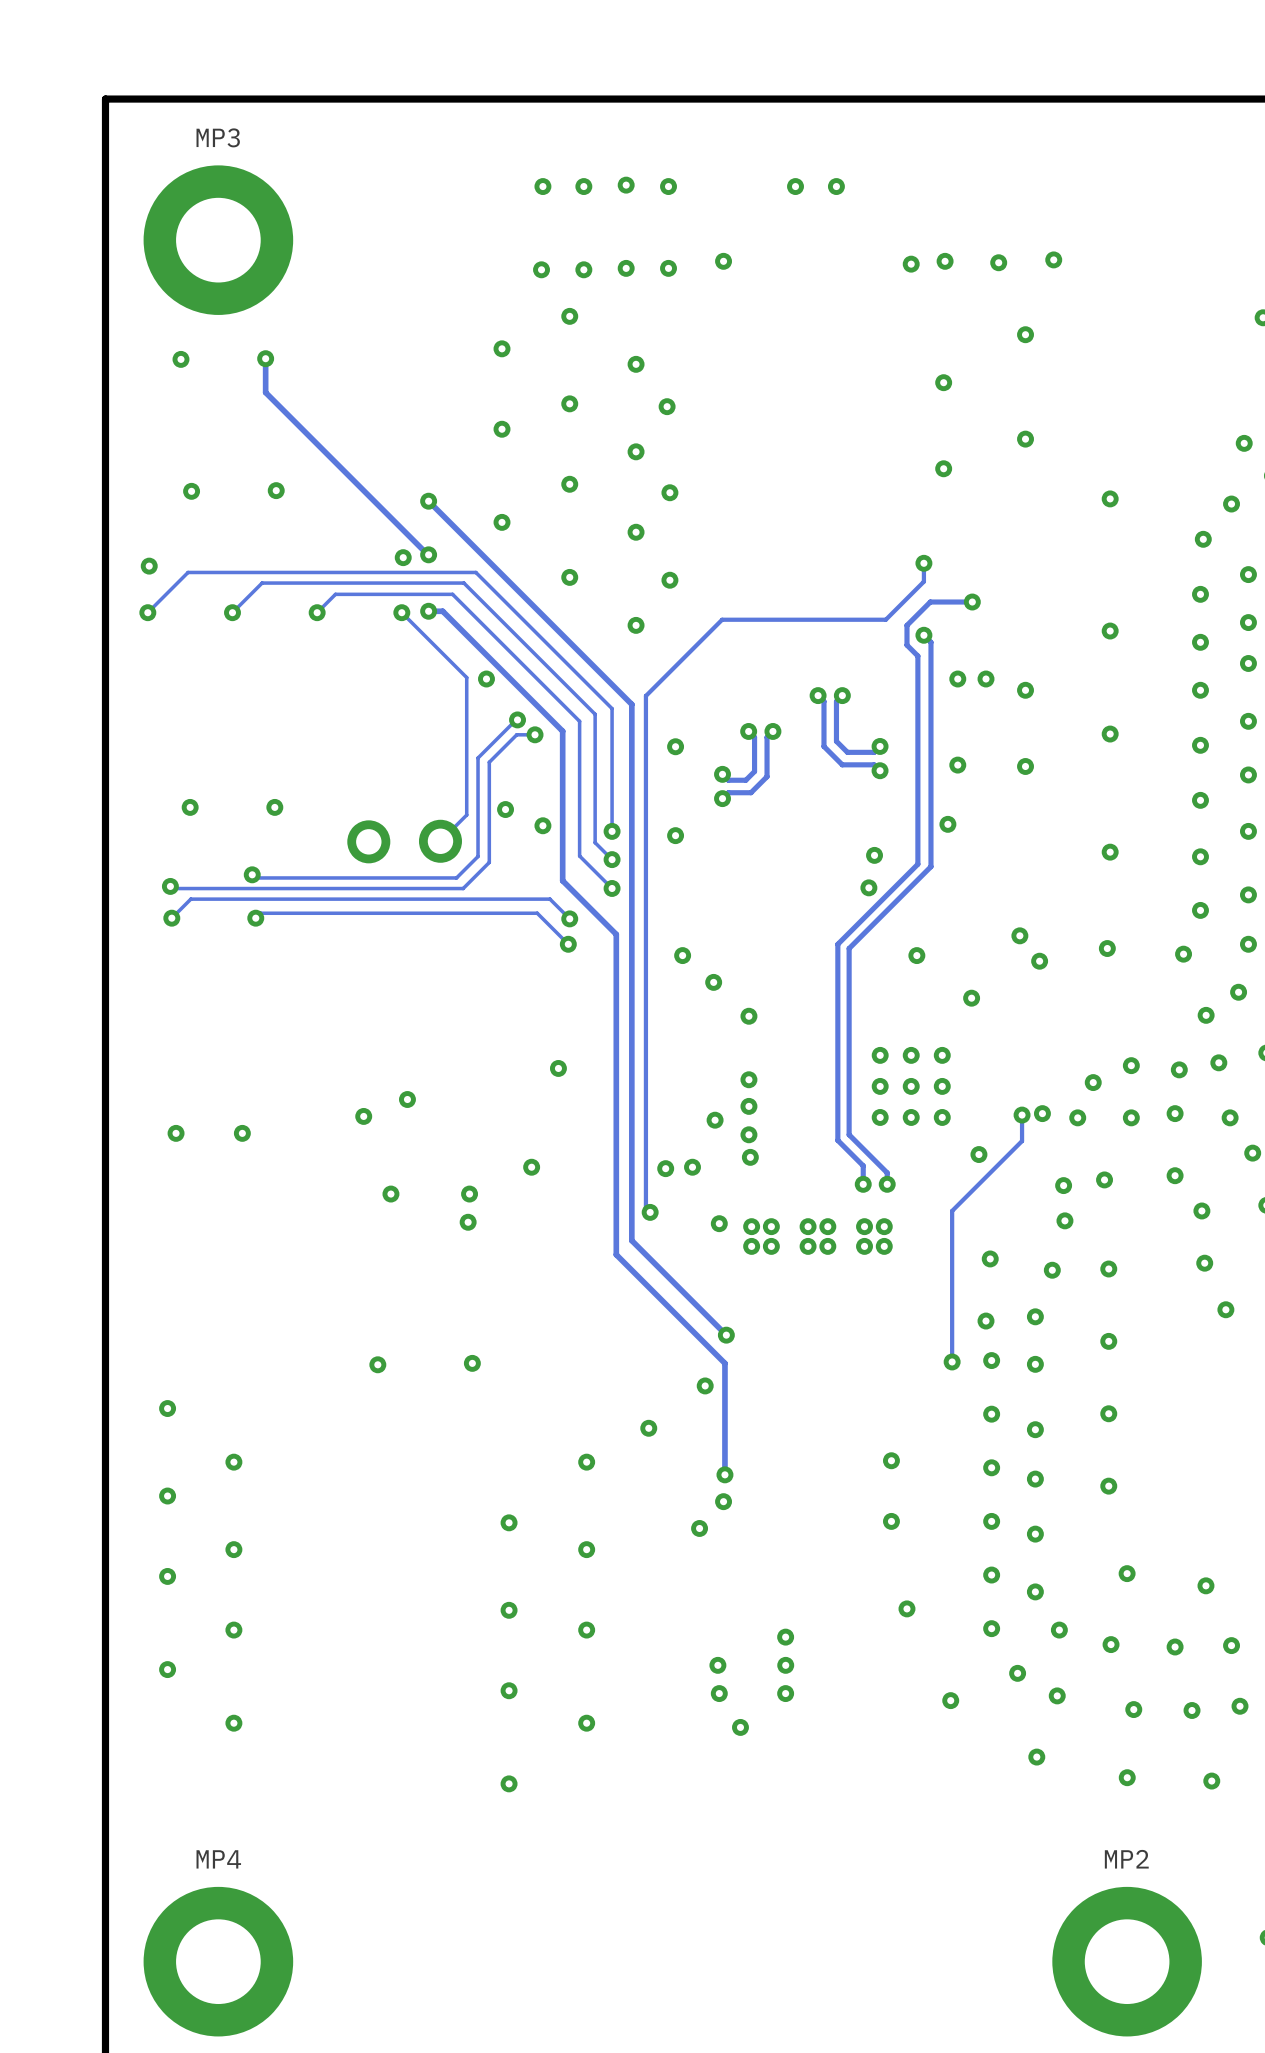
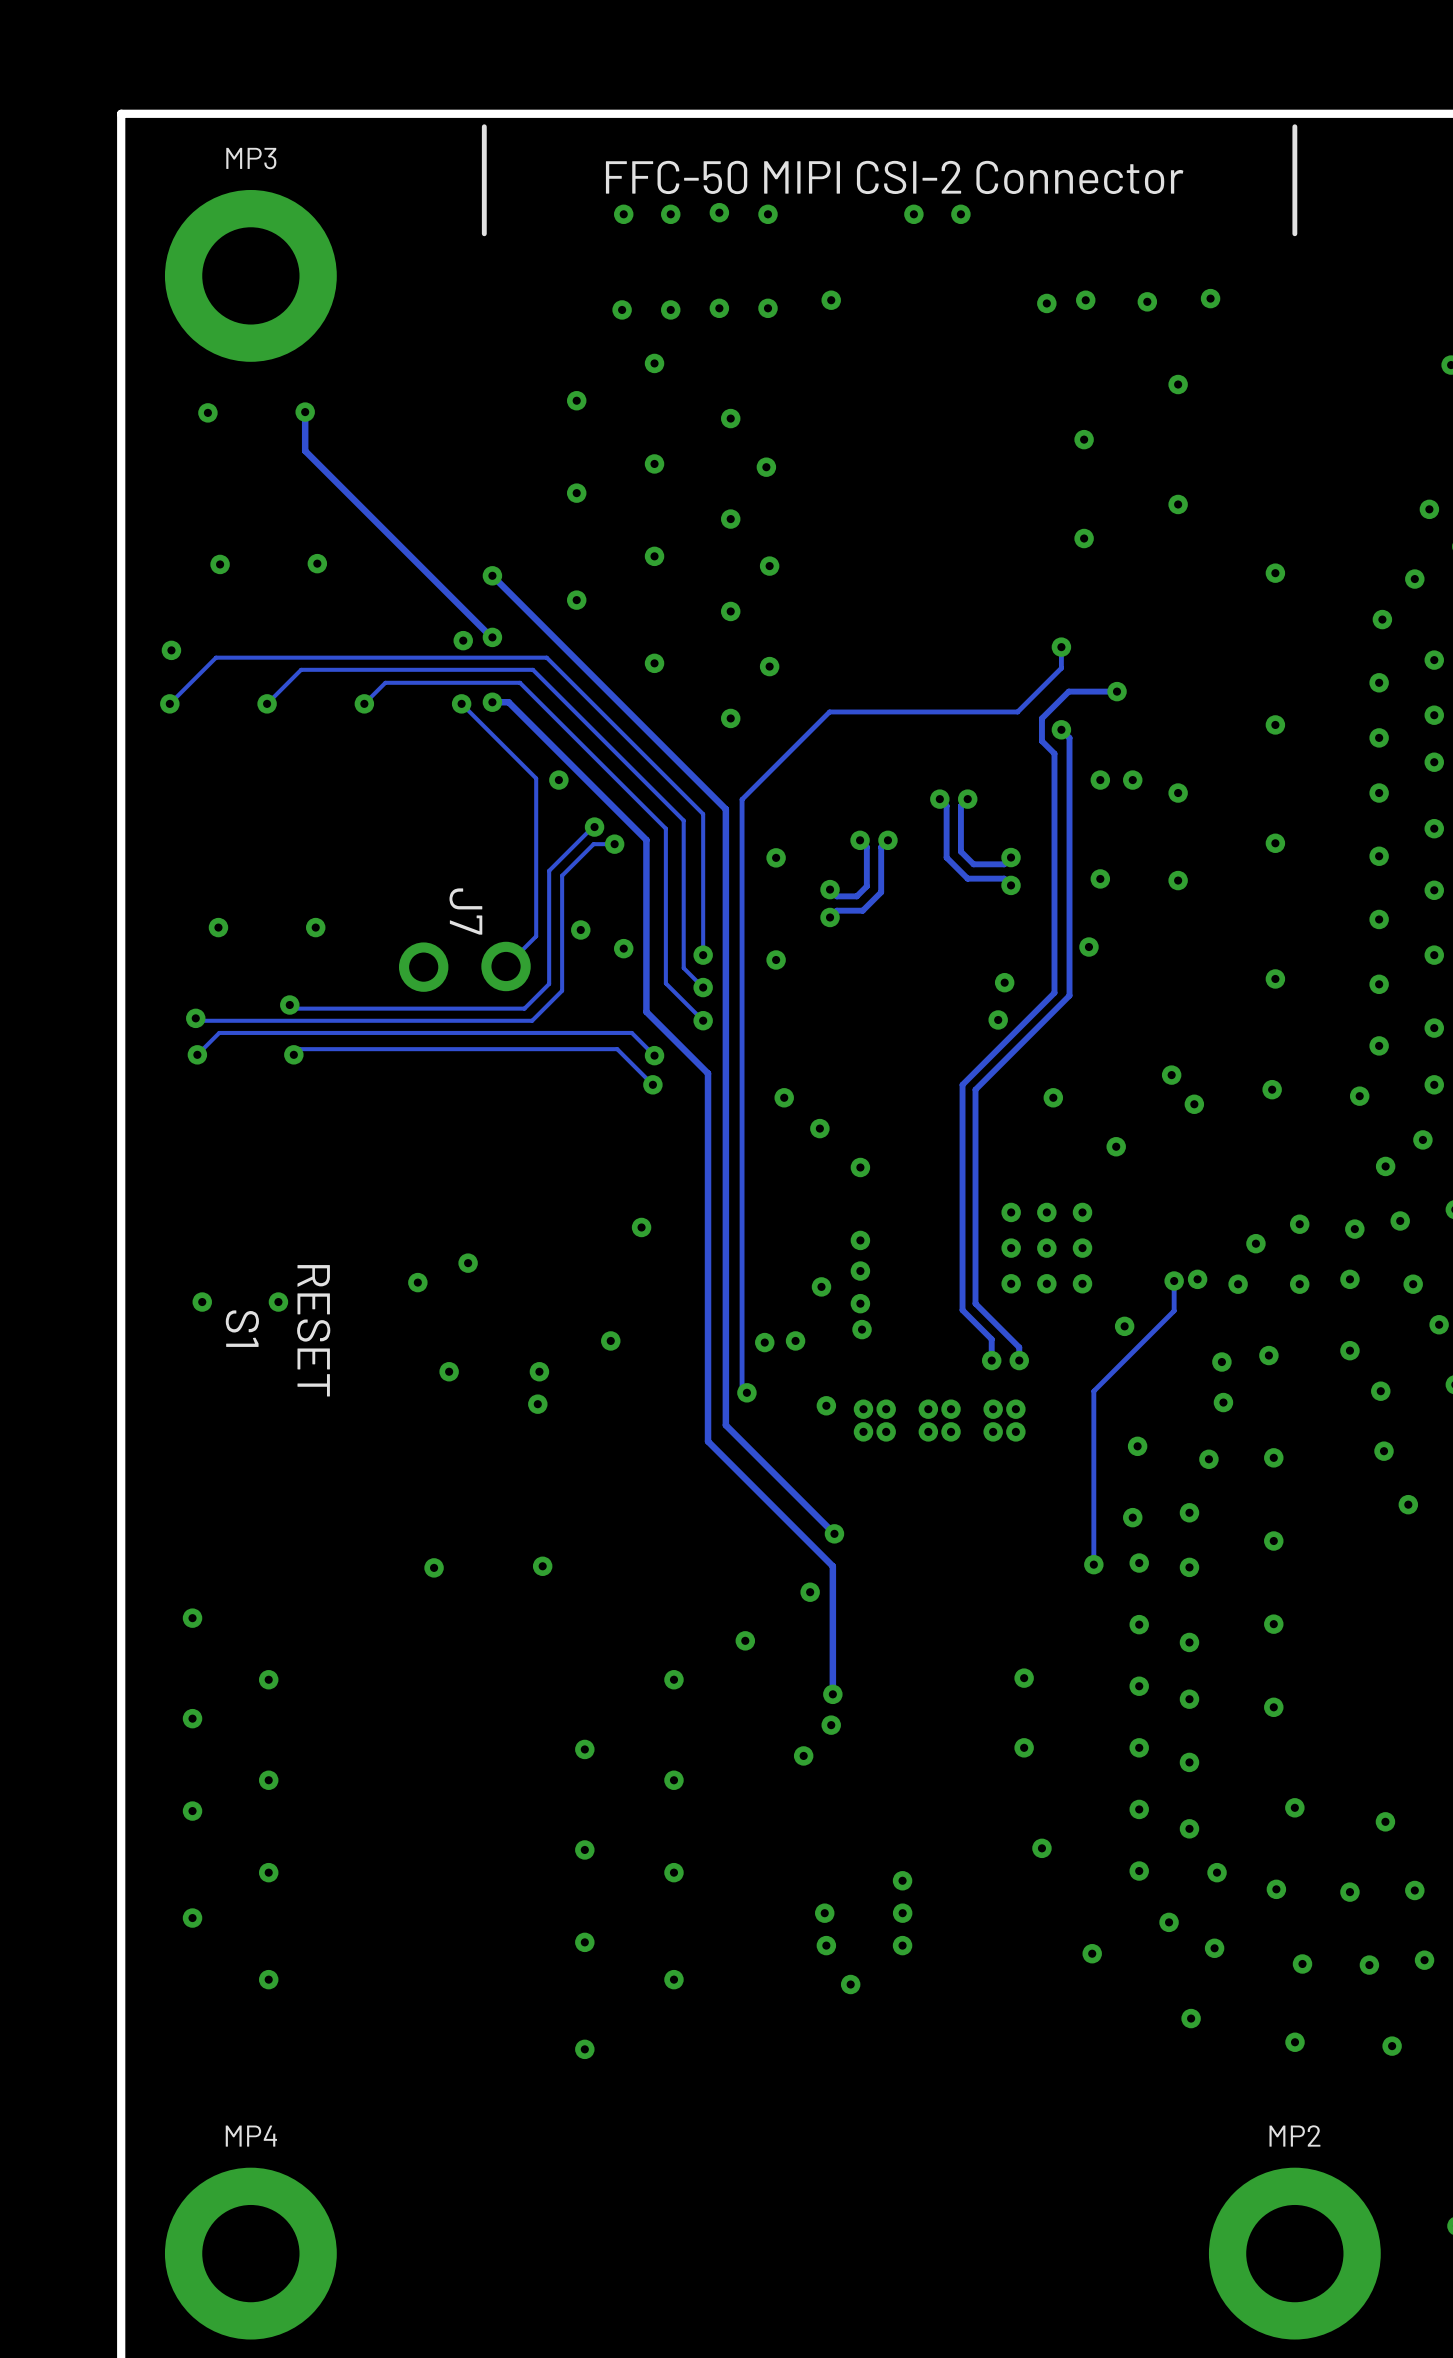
line: none -> (484, 126) (484, 233)
line: none -> (1294, 126) (1294, 233)
text: none -> FFC-50 MIPI CSI-2 Connector (894, 177)
text: none -> J7 (465, 911)
text: none -> S1 (242, 1328)
text: none -> RESET (313, 1330)

